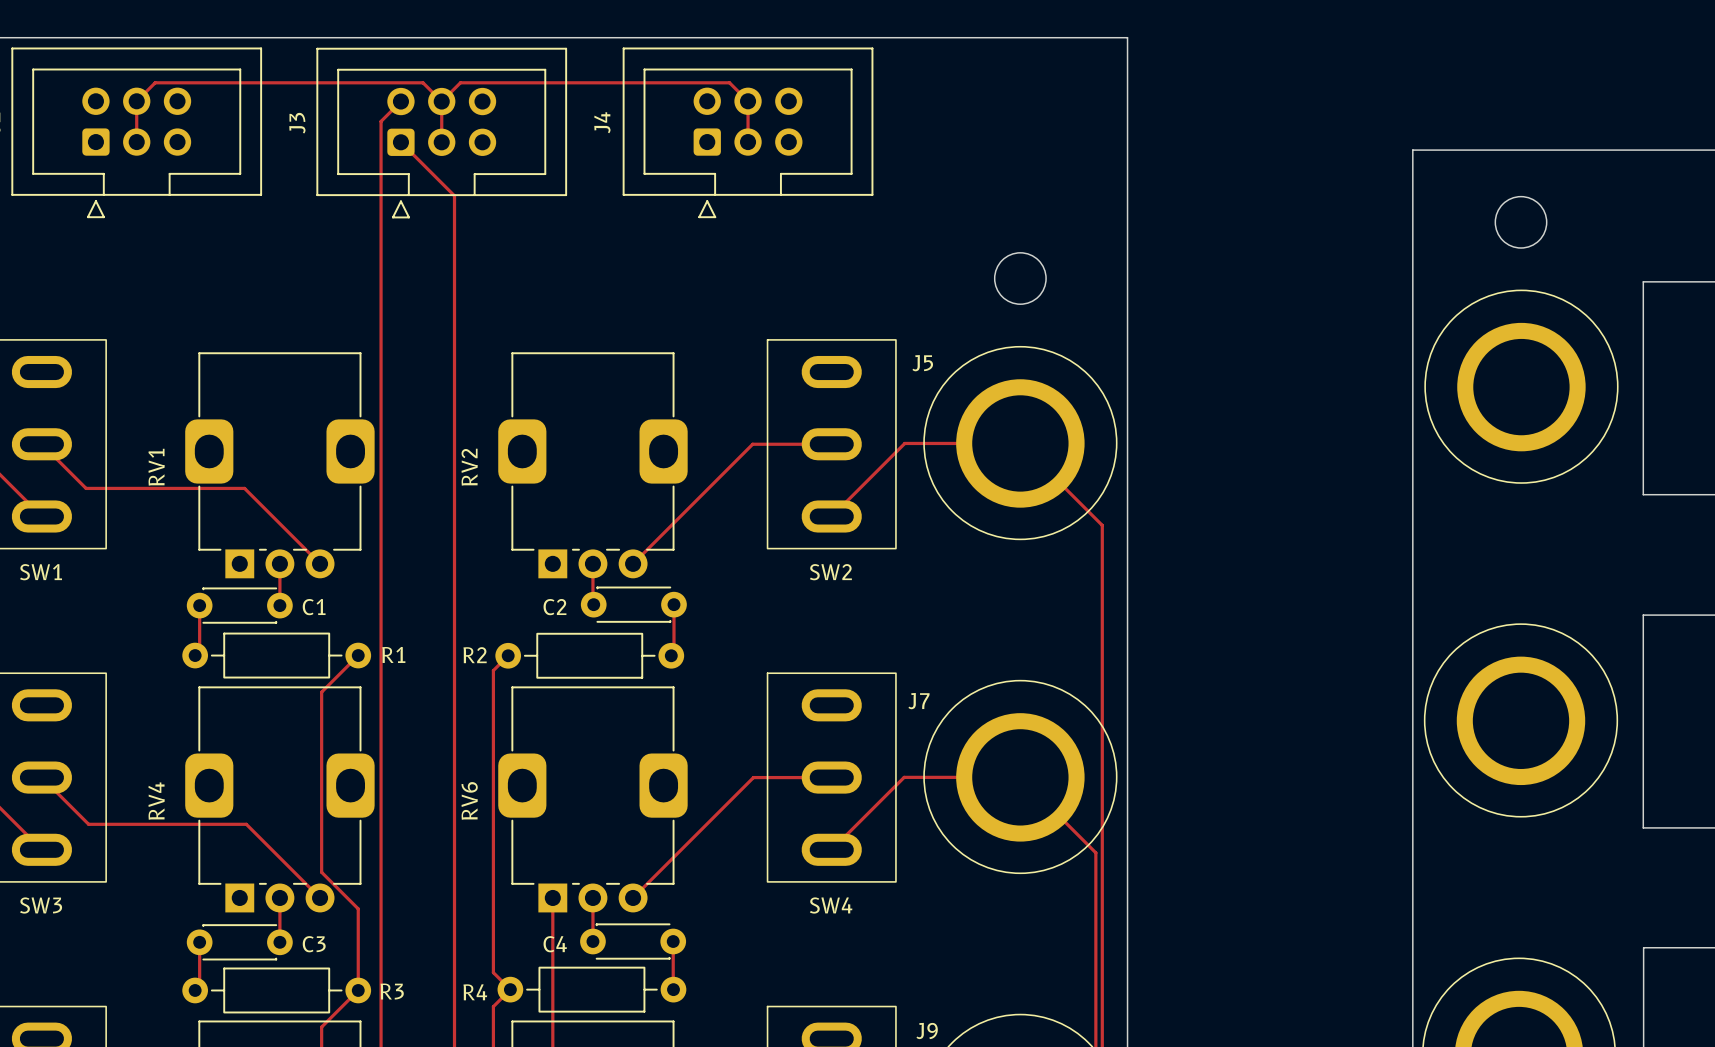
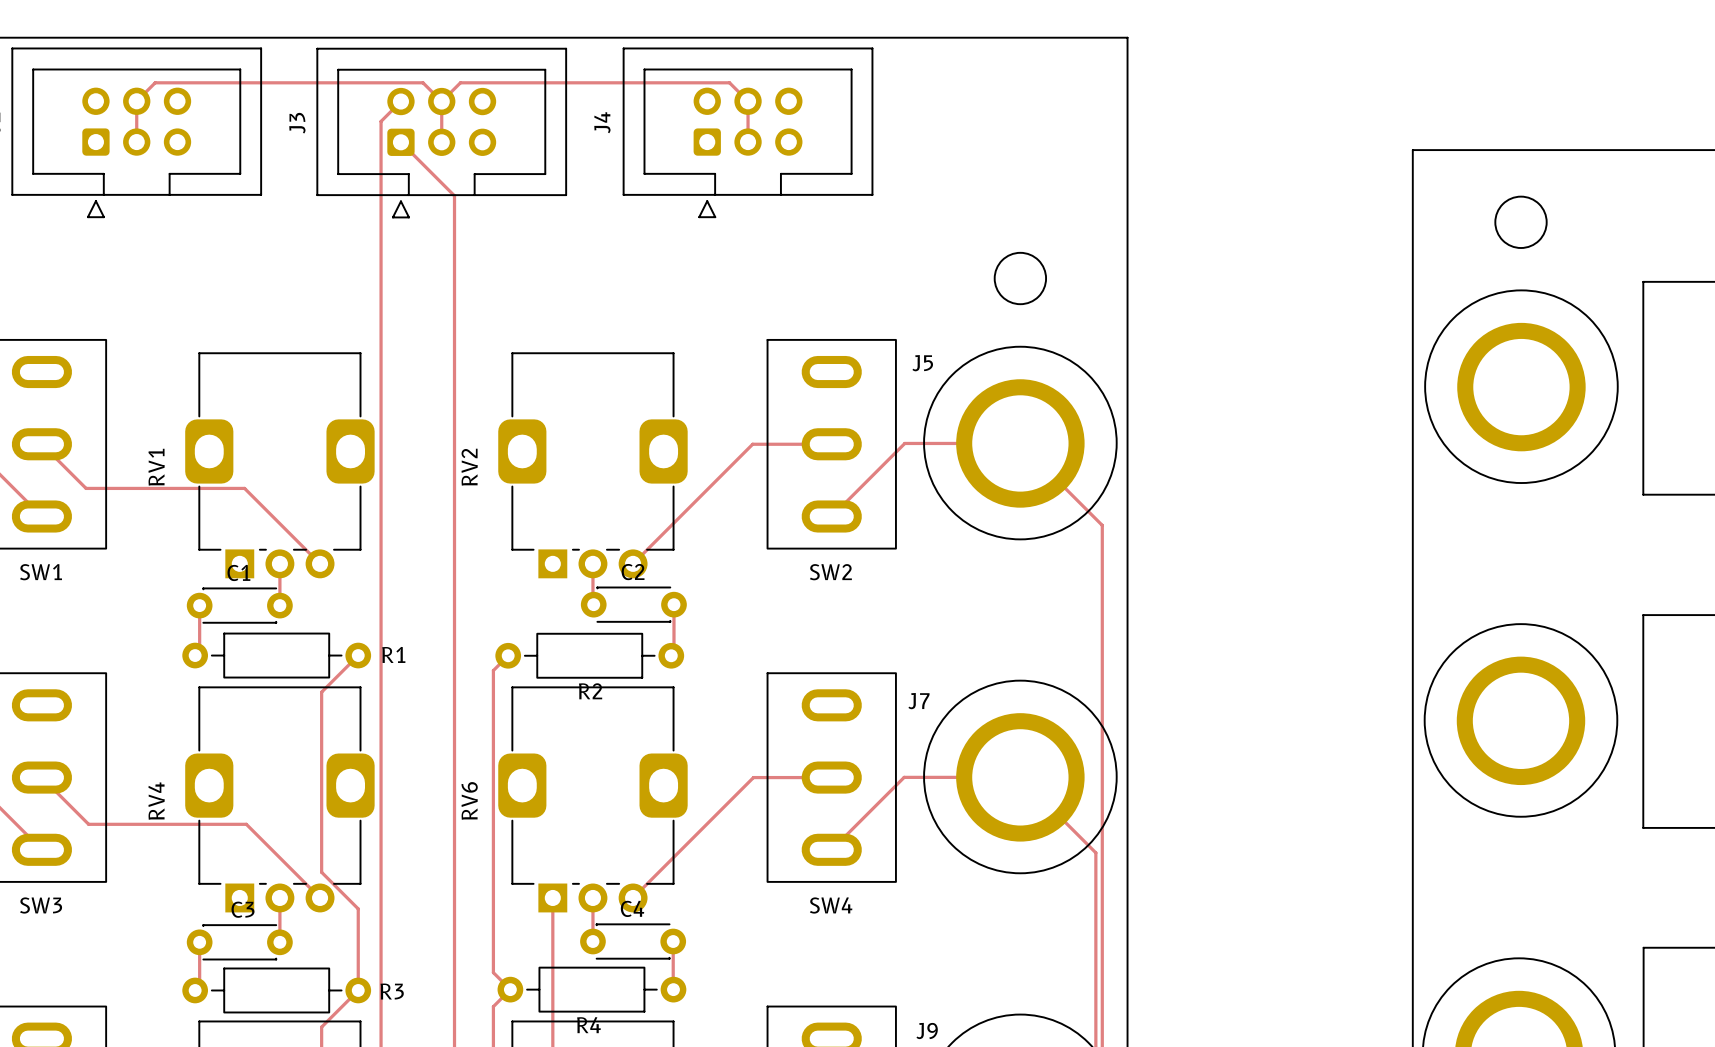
C1 name position: C1 (314, 607) -> C1 (238, 572)
C2 name position: C2 (554, 607) -> C2 (633, 572)
R2 name position: R2 (475, 655) -> R2 (590, 691)
C3 name position: C3 (314, 944) -> C3 (242, 909)
C4 name position: C4 (555, 944) -> C4 (632, 908)
R4 name position: R4 (475, 992) -> R4 (588, 1025)

